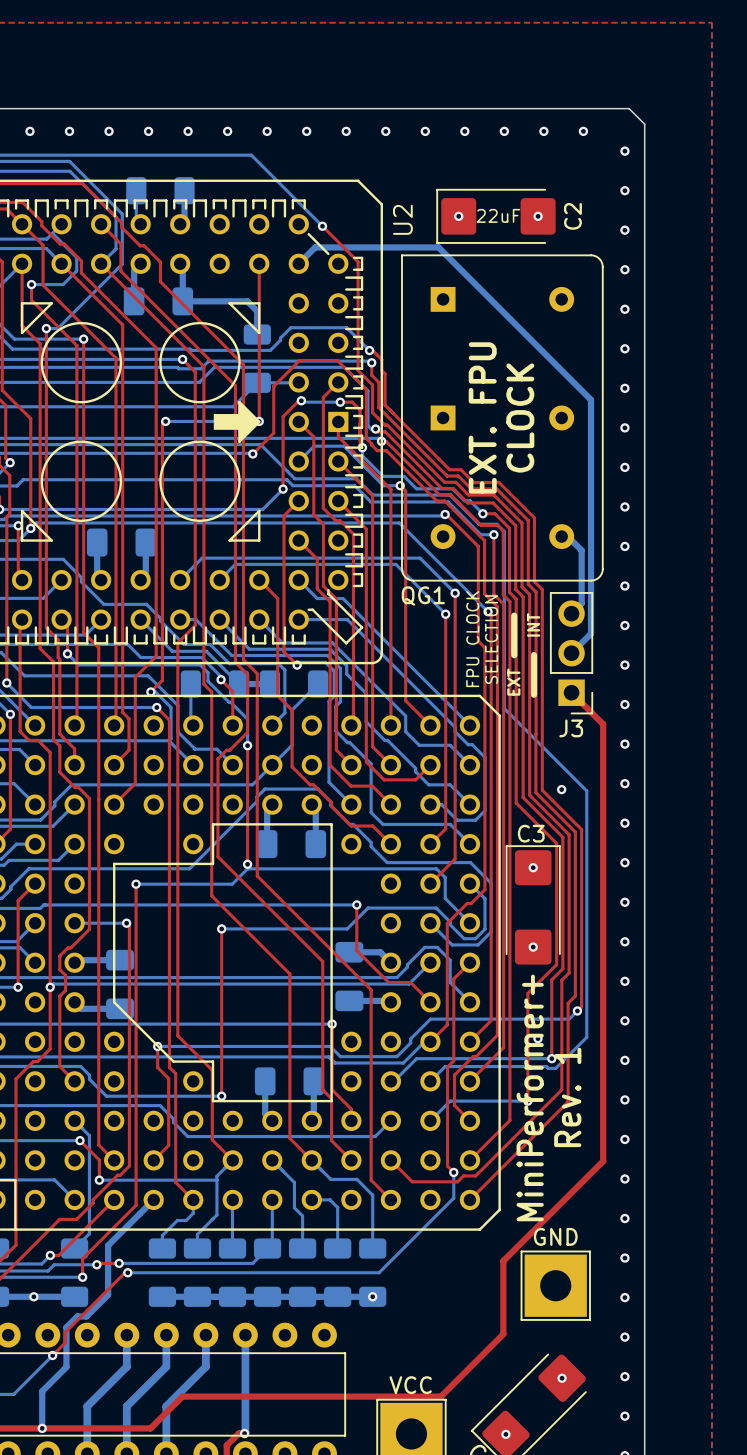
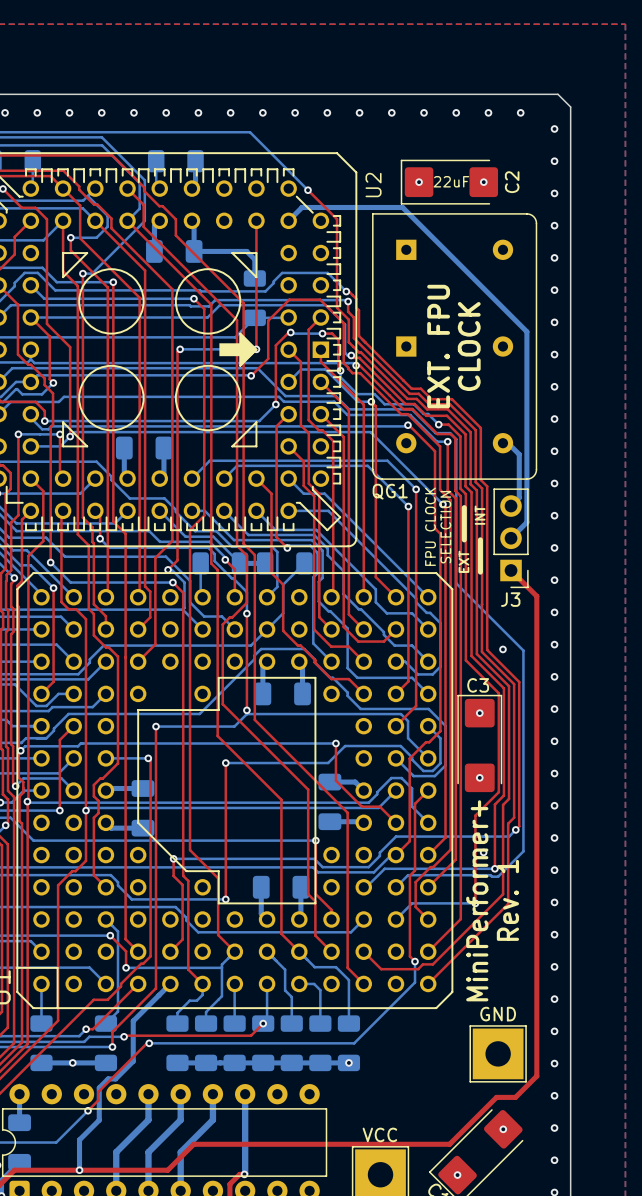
top track: (603, 1161) (503, 1261) (503, 1334) (440, 1396) -> (536, 952) (536, 1076) (515, 1097) (496, 1097) (449, 1144) (404, 1144)
top track: none -> (263, 1023) (251, 1035) (142, 1035)
bottom track: (267, 1248) (252, 1263) (119, 1263) -> none
via: none -> (263, 1023)
via: (119, 1263) -> none

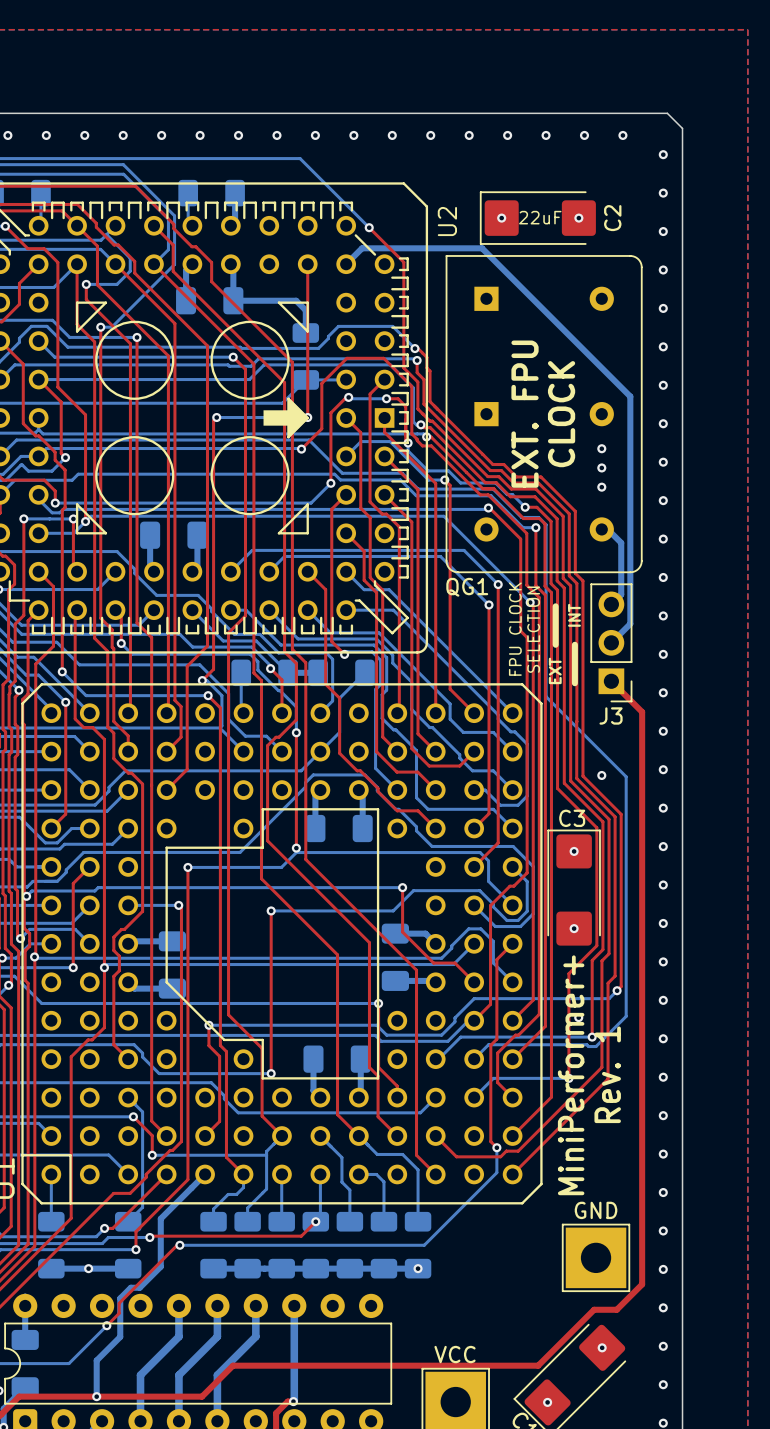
via: none -> (601, 448)
via: none -> (601, 467)
via: none -> (601, 487)

